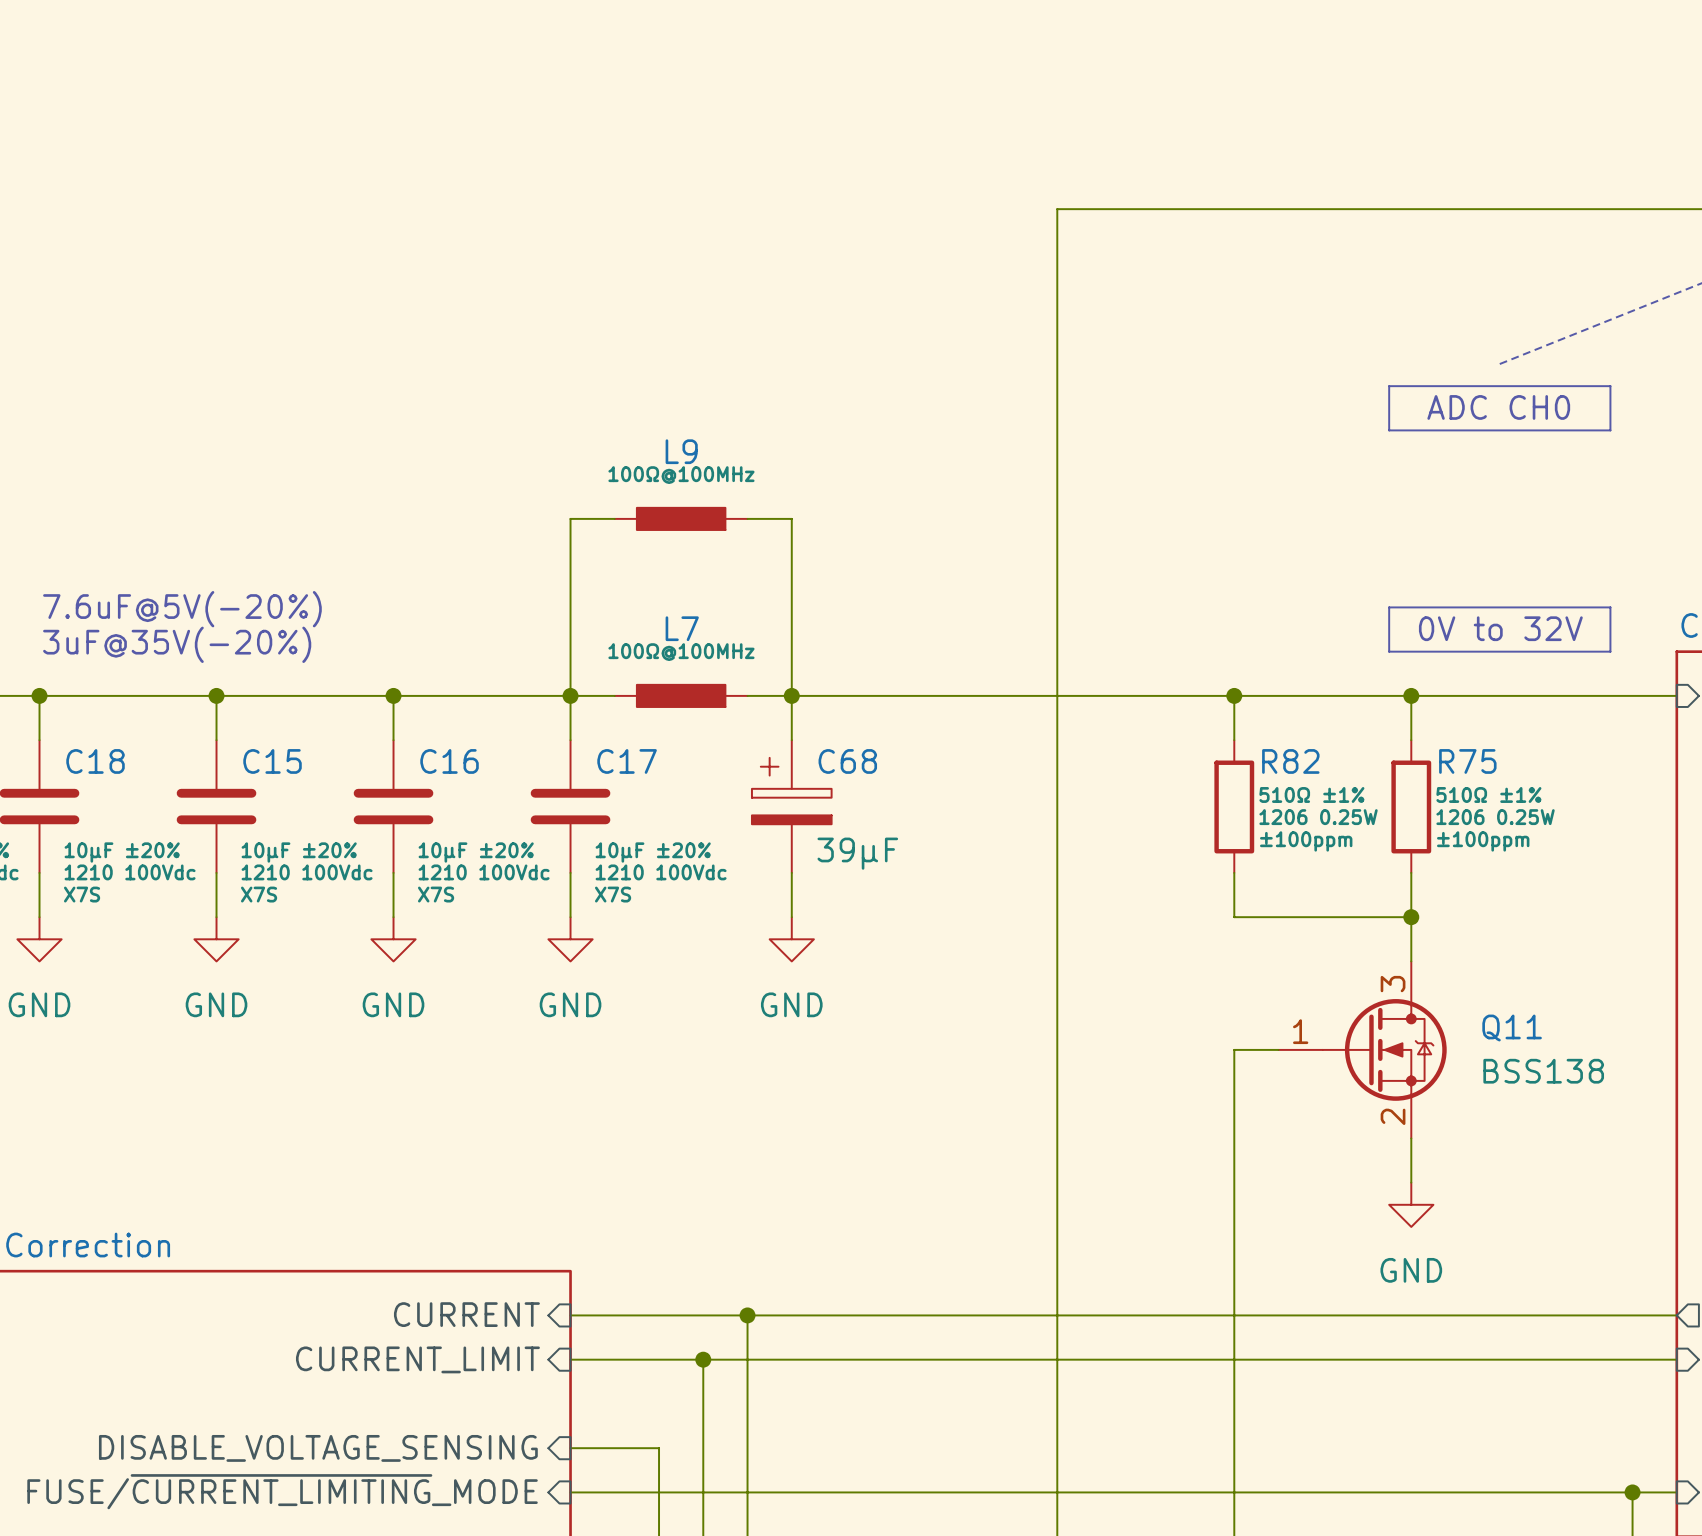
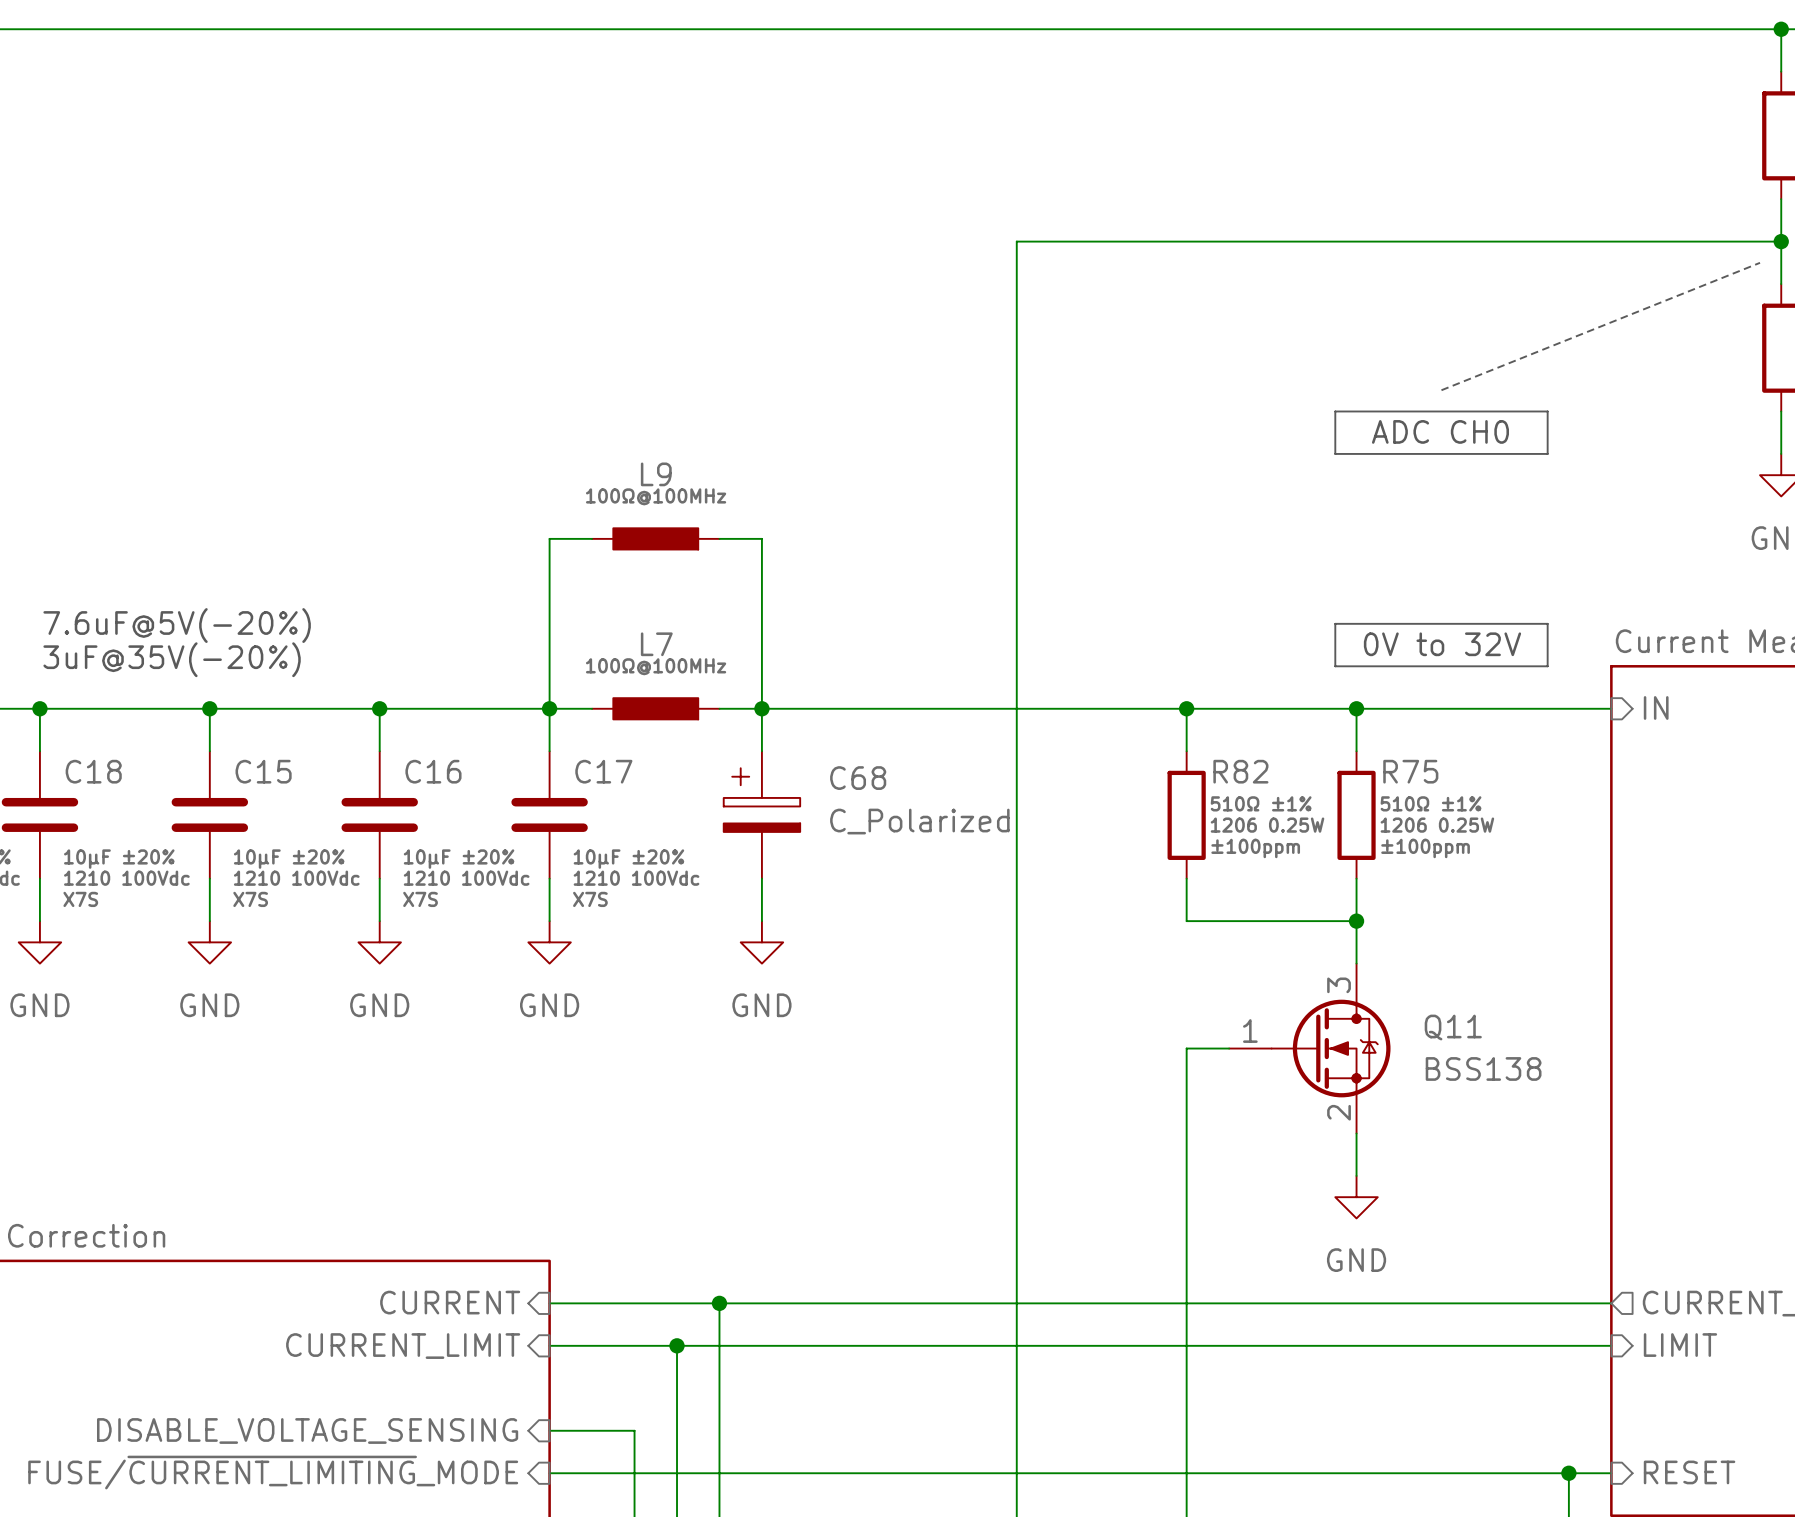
C68 name position: C68 (847, 761) -> C68 (858, 778)
C68 value: 39µF (857, 853) -> C_Polarized (919, 821)

